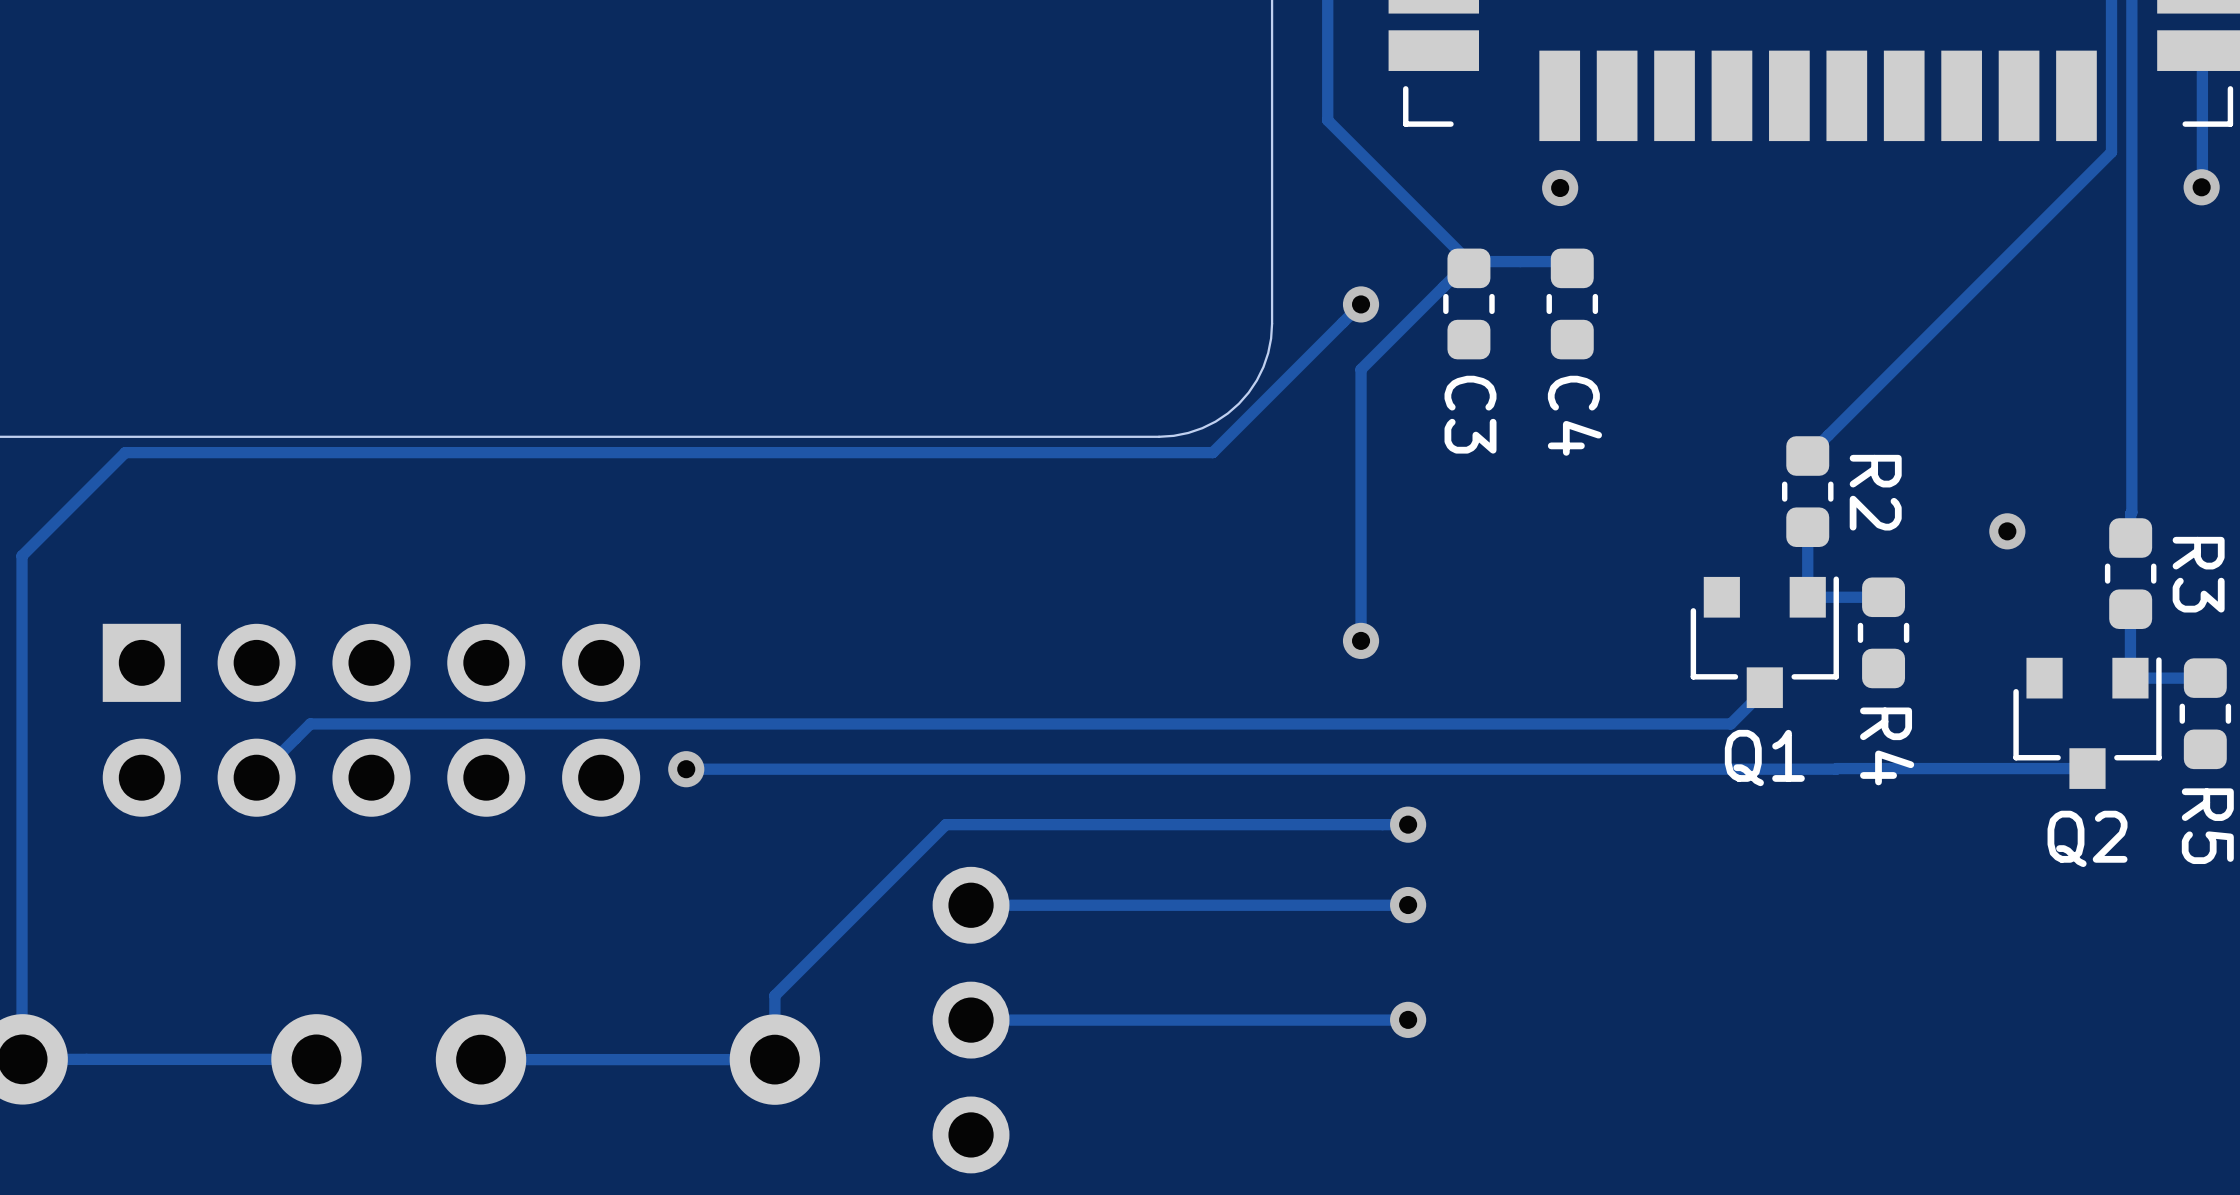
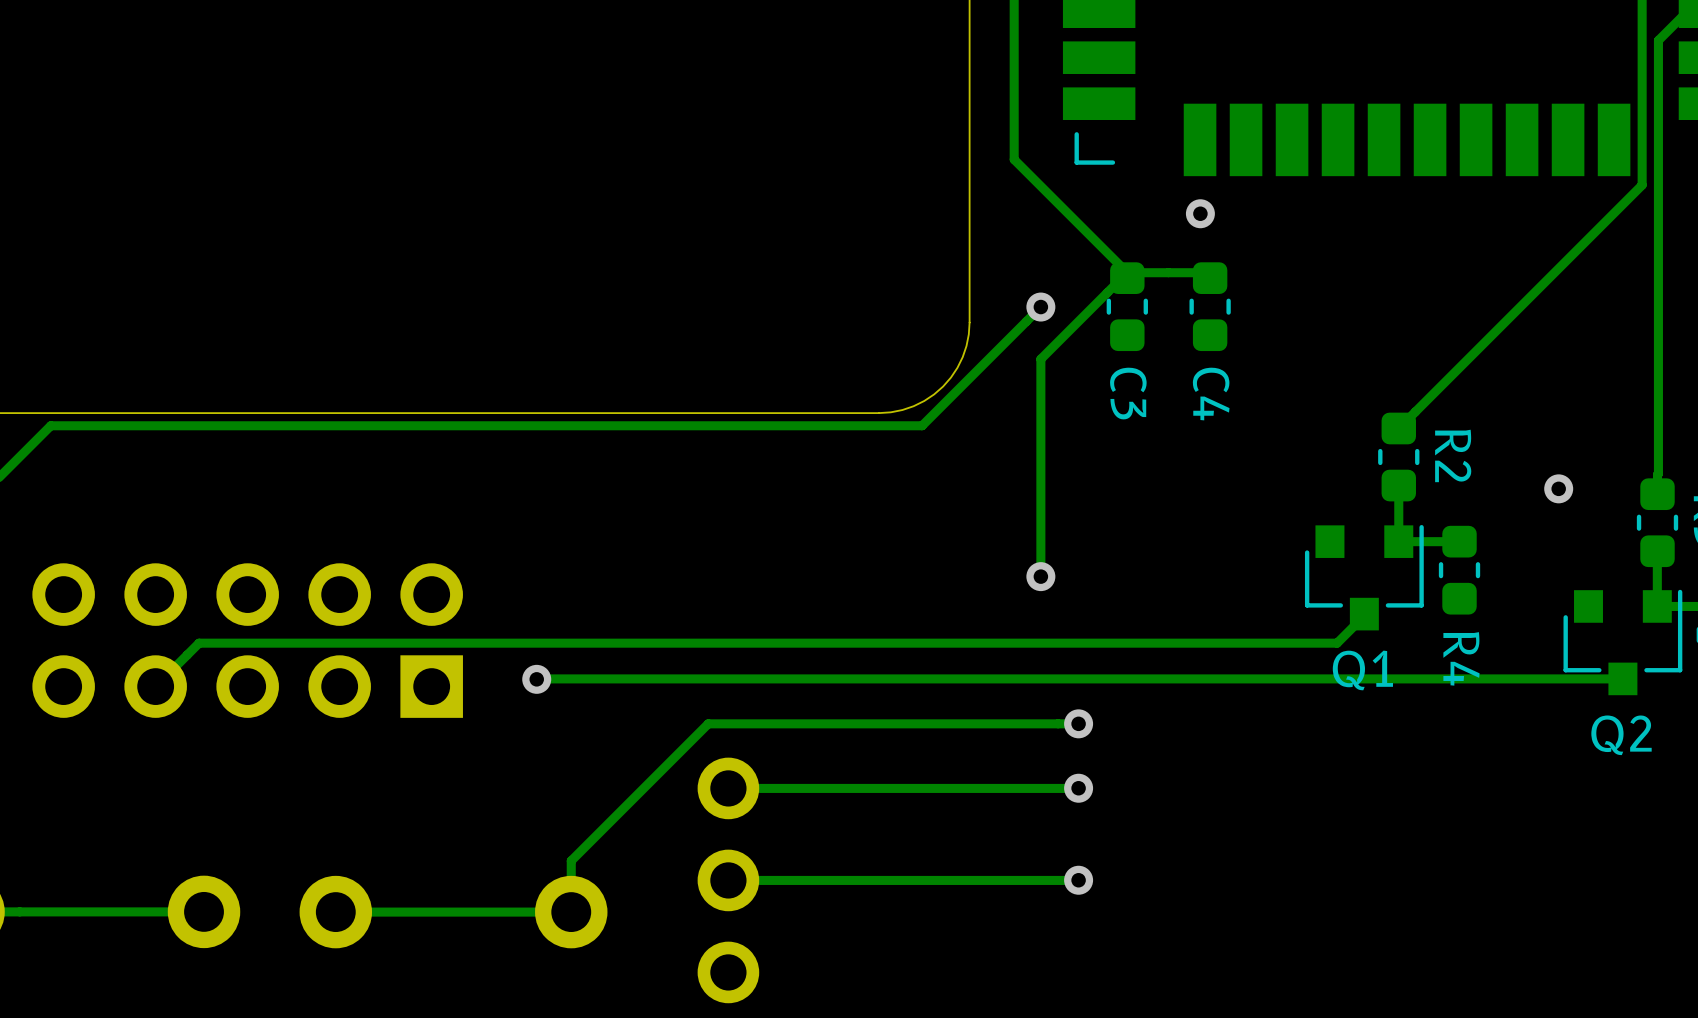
part rotation: 0° (371, 720) -> 180° (247, 640)
via position: (686, 769) -> (536, 679)
track: (1836, 769) (686, 769) -> (1422, 678) (537, 678)

